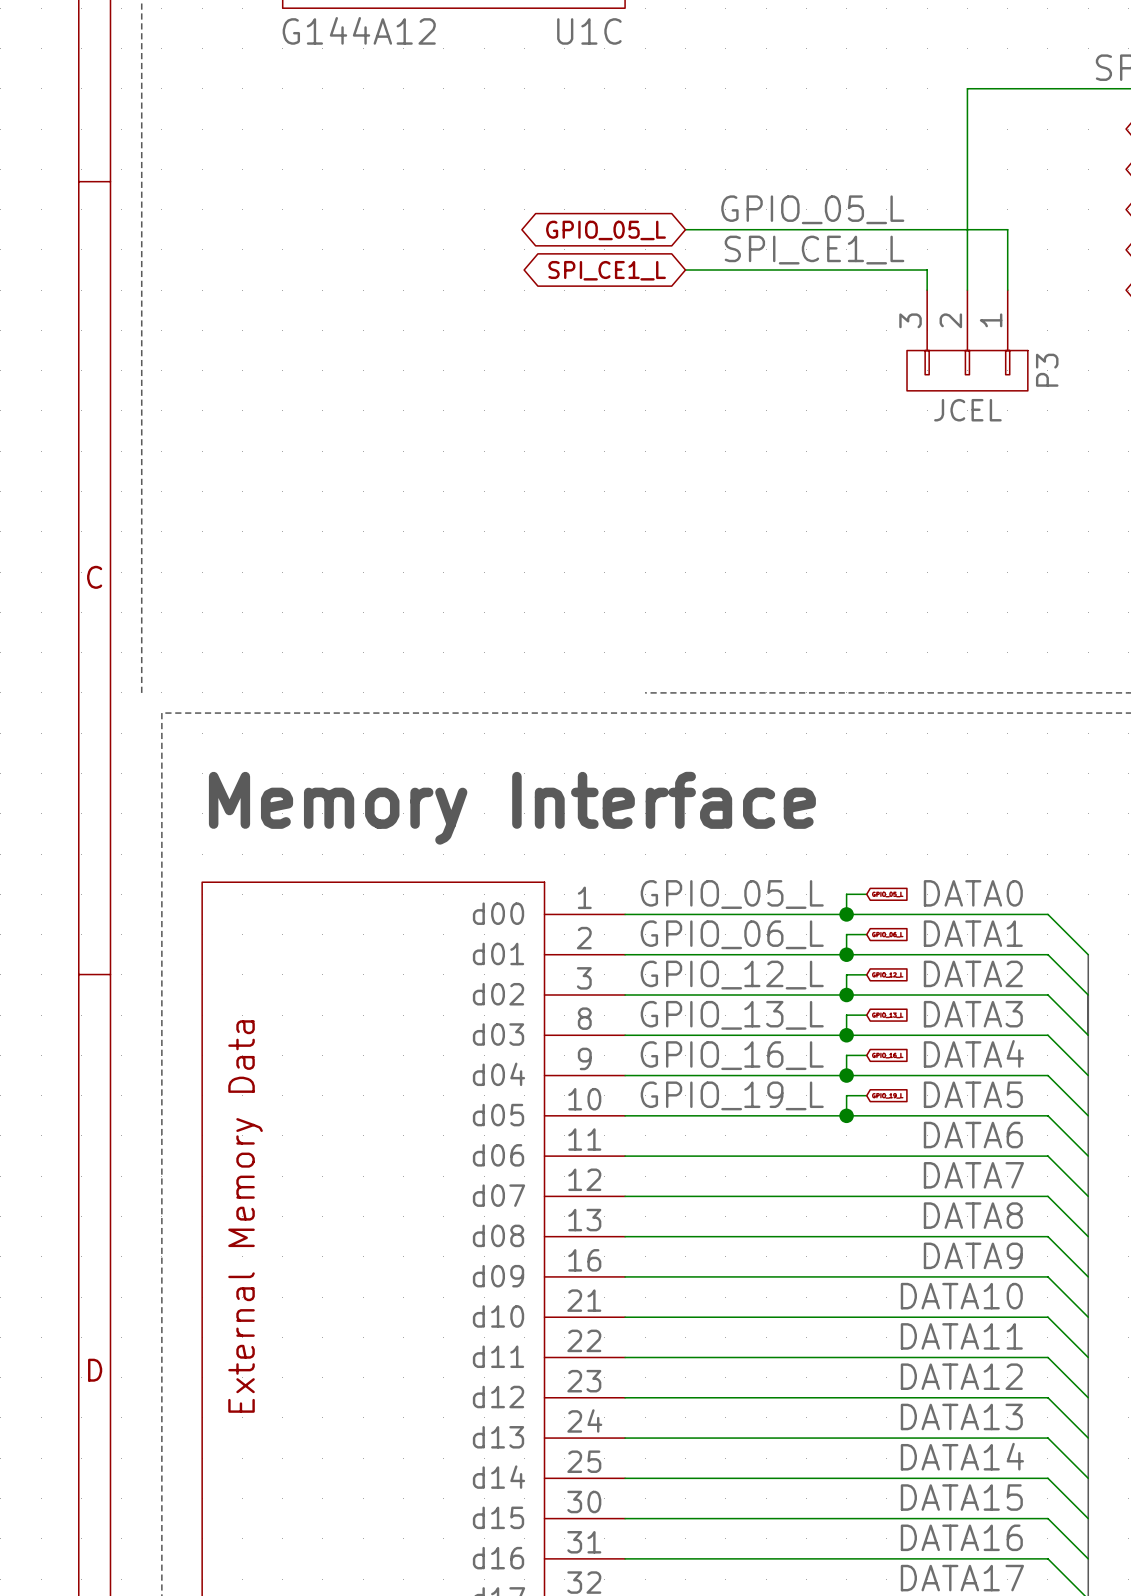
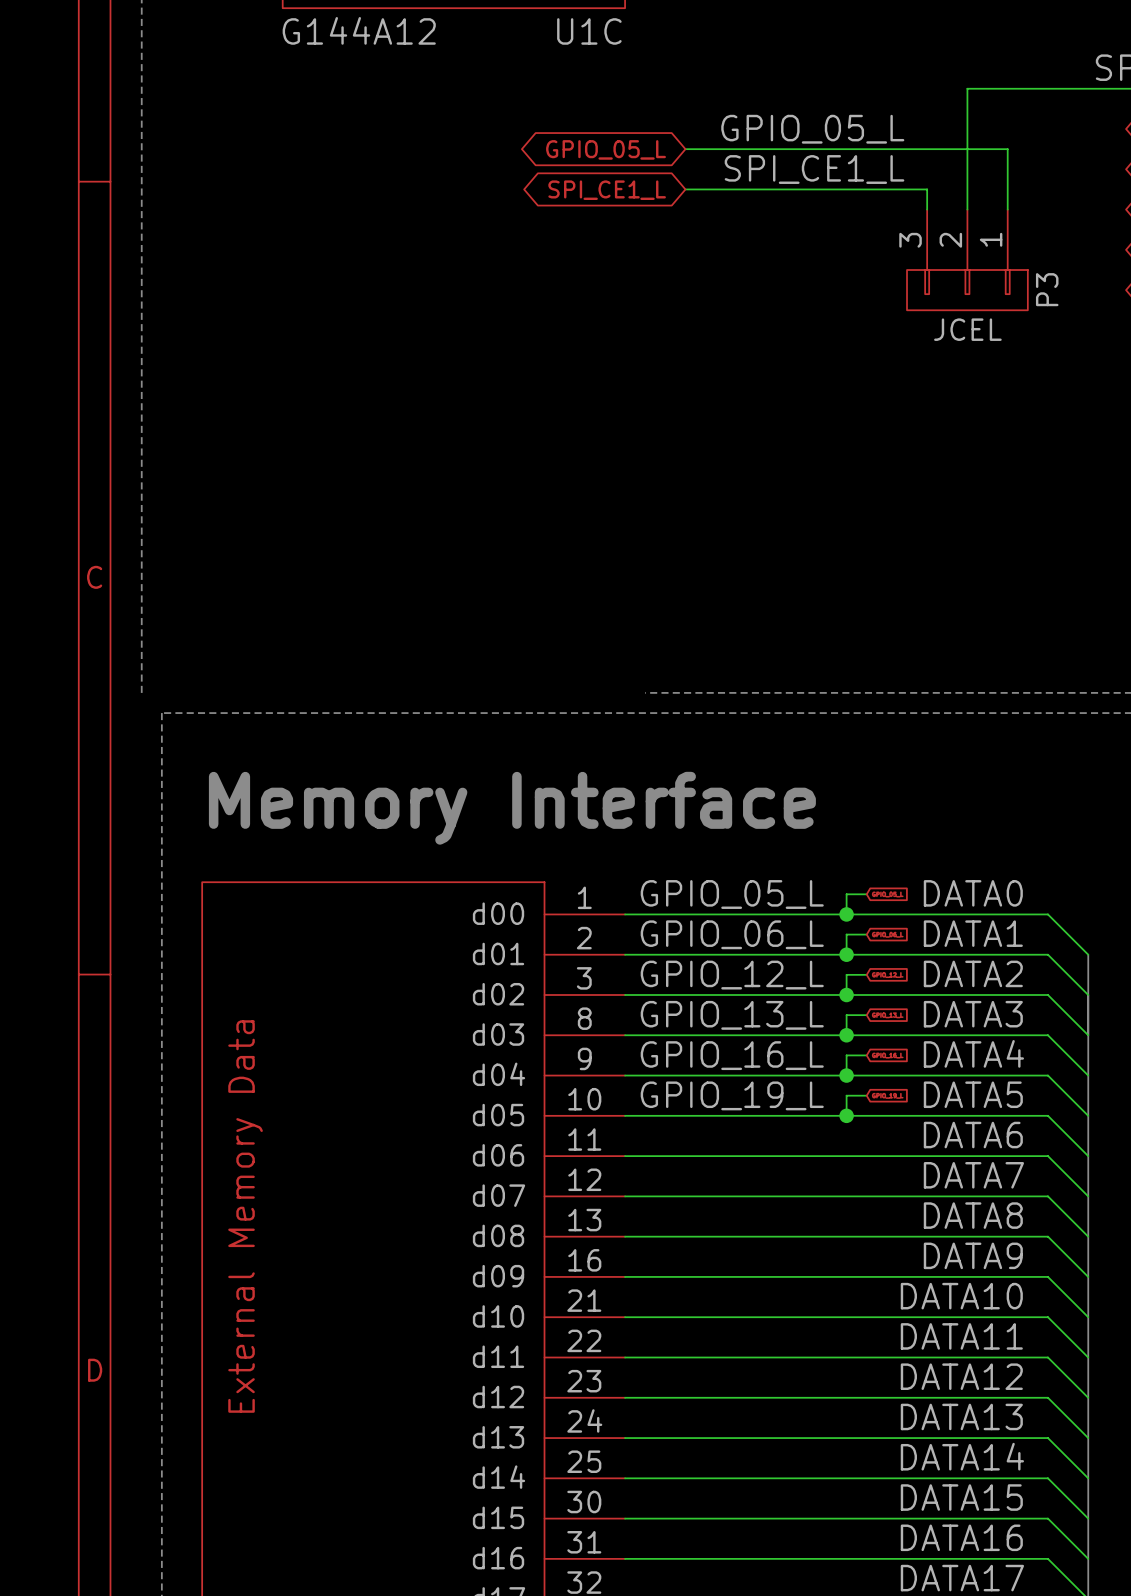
label position: GPIO_05_L (812, 209) -> GPIO_05_L (812, 129)
wire: (685, 229) (1007, 229) (1007, 290) -> (685, 149) (1007, 149) (1007, 209)
global label position: GPIO_05_L (606, 230) -> GPIO_05_L (606, 149)
label position: SPI_CE1_L (814, 250) -> SPI_CE1_L (814, 169)
global label position: SPI_CE1_L (607, 270) -> SPI_CE1_L (607, 190)
wire: (685, 270) (927, 270) (927, 290) -> (685, 189) (927, 189) (927, 209)
P3 position: (967, 340) -> (967, 259)

